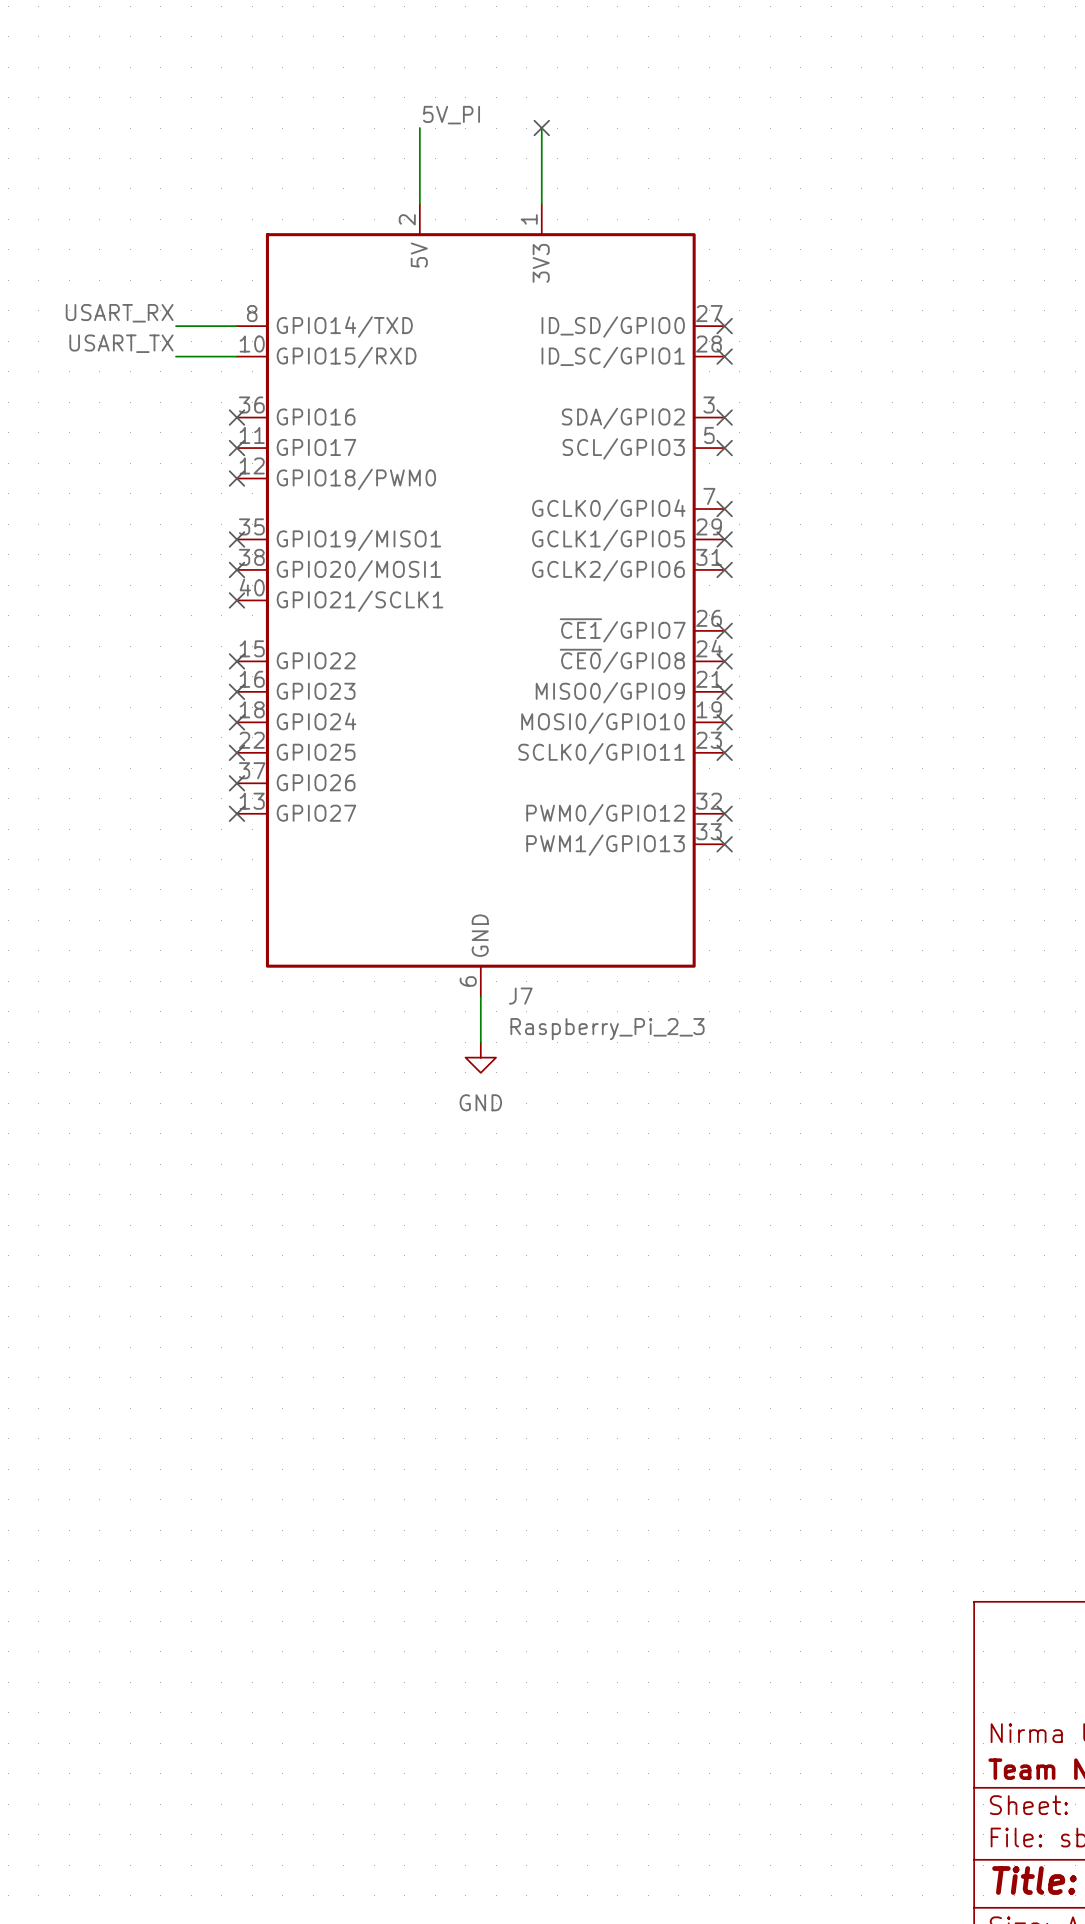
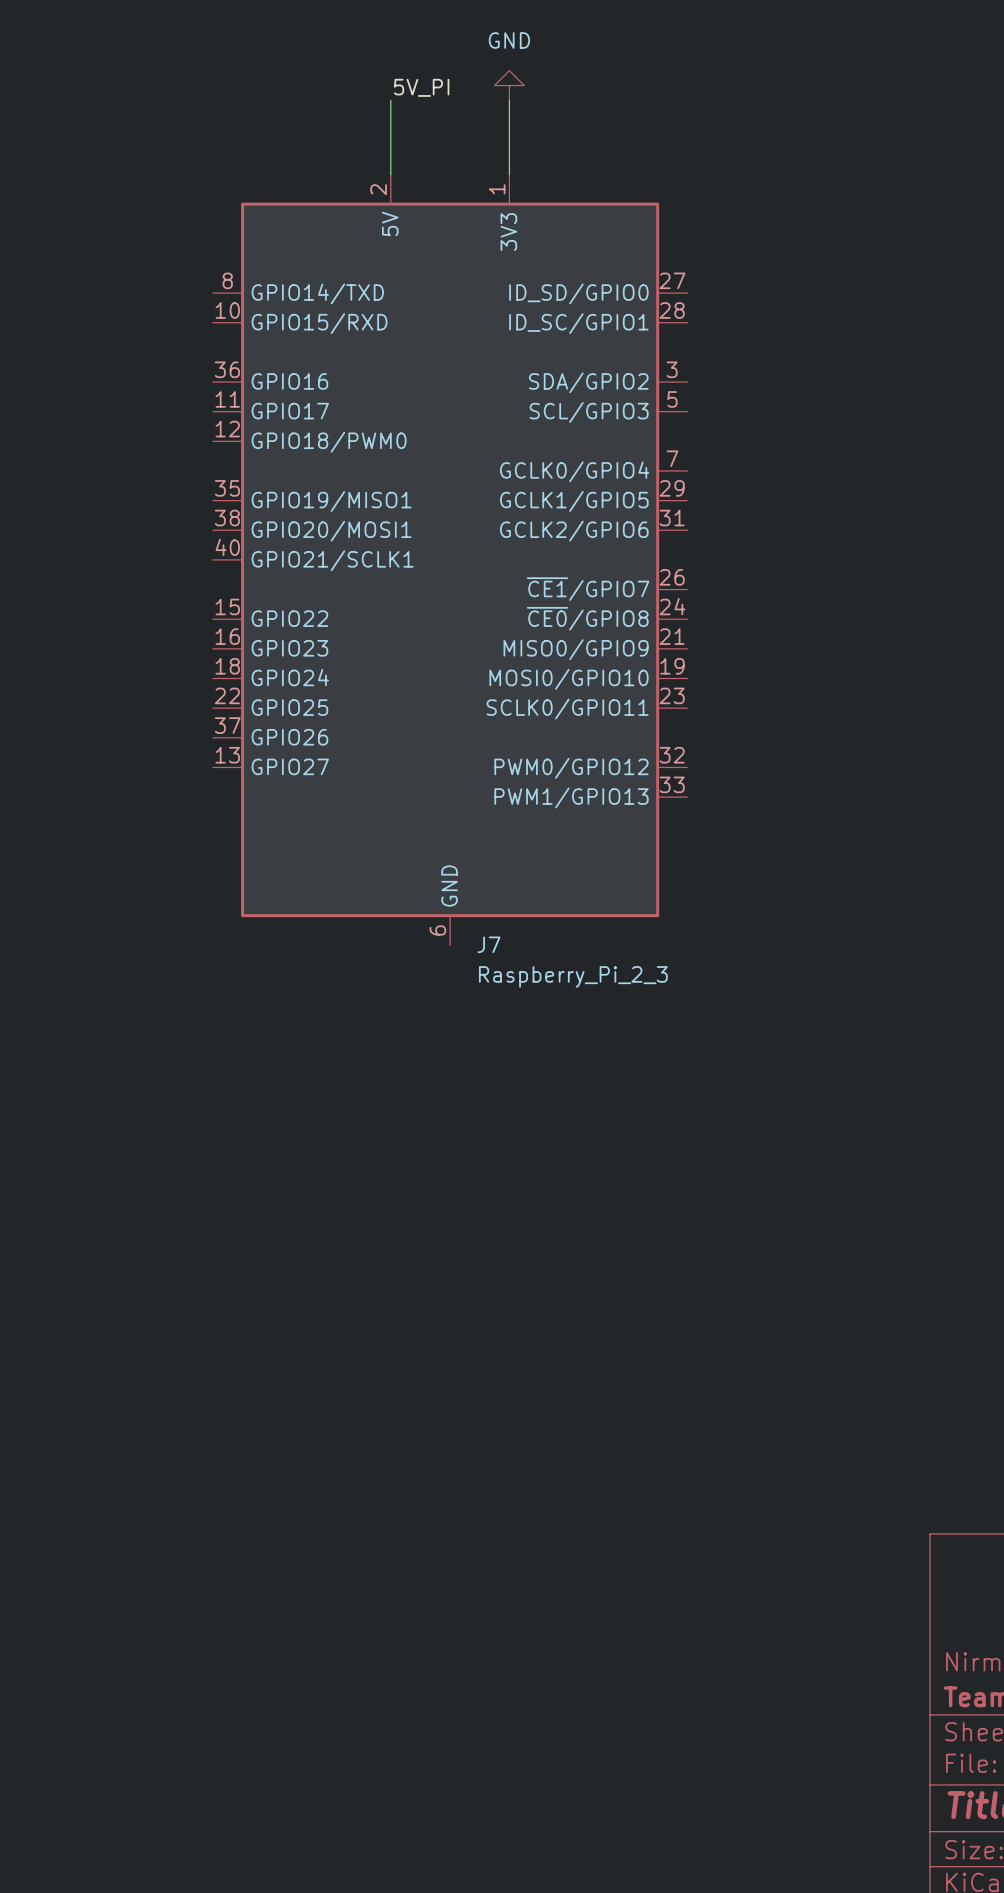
power symbol: none -> GND (509, 85)
no-connect mark: (541, 128) -> none
label: USART_RX (119, 313) -> none
wire: (176, 326) (236, 326) -> none
no-connect mark: (724, 326) -> none
label: USART_TX (121, 343) -> none
wire: (176, 356) (236, 356) -> none
no-connect mark: (724, 356) -> none
no-connect mark: (236, 417) -> none
no-connect mark: (724, 417) -> none
no-connect mark: (236, 448) -> none
no-connect mark: (724, 448) -> none
no-connect mark: (236, 478) -> none
no-connect mark: (724, 508) -> none
no-connect mark: (236, 539) -> none
no-connect mark: (724, 539) -> none
no-connect mark: (236, 569) -> none
no-connect mark: (724, 569) -> none
no-connect mark: (236, 600) -> none
no-connect mark: (724, 630) -> none
no-connect mark: (236, 661) -> none
no-connect mark: (724, 661) -> none
no-connect mark: (236, 691) -> none
no-connect mark: (724, 691) -> none
no-connect mark: (236, 722) -> none
no-connect mark: (724, 722) -> none
no-connect mark: (236, 752) -> none
no-connect mark: (724, 752) -> none
no-connect mark: (236, 783) -> none
no-connect mark: (236, 813) -> none
no-connect mark: (724, 813) -> none
no-connect mark: (724, 844) -> none
wire: (480, 996) (480, 1042) -> none
power symbol: GND (480, 1057) -> none

